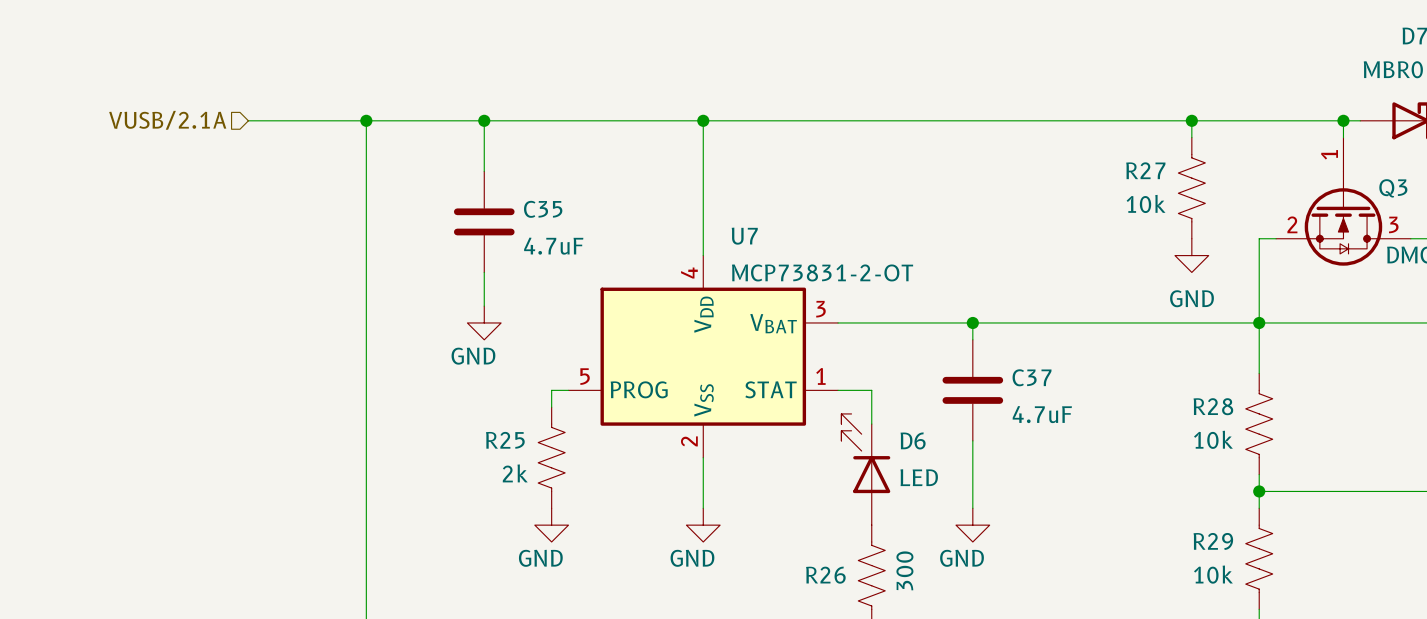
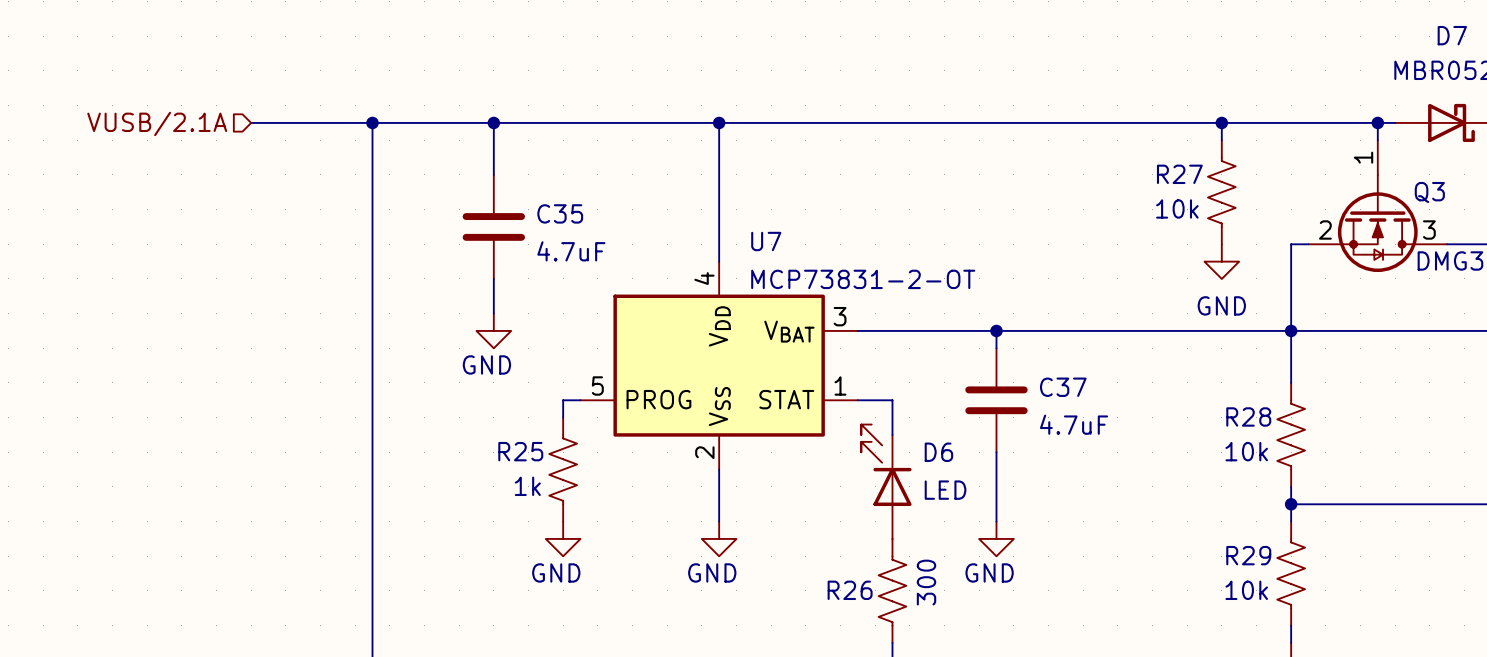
R25 value: 2k (515, 473) -> 1k (527, 486)

